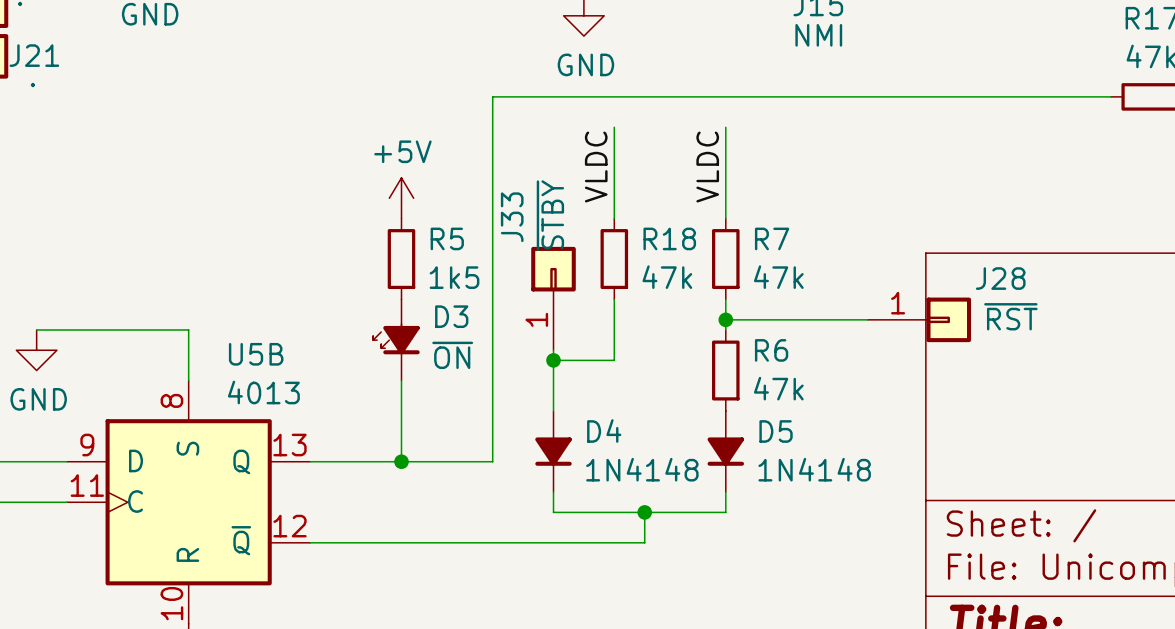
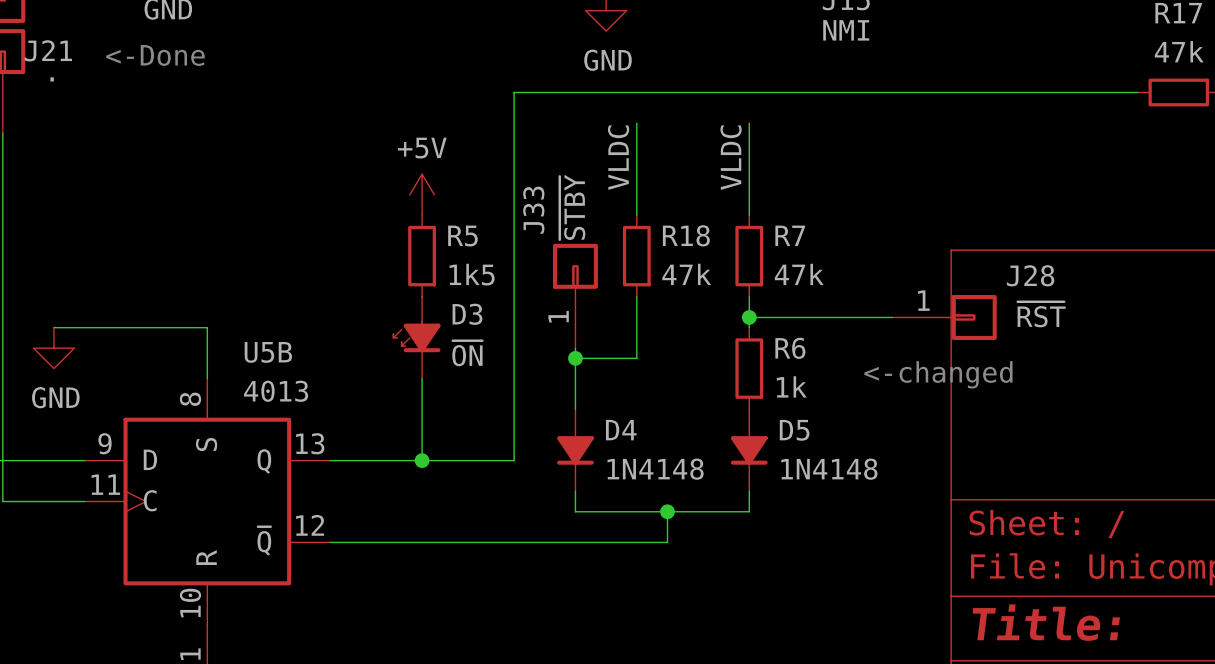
text: none -> <-Done (155, 55)
text: none -> <-changed (938, 374)
R6 value: 47k (778, 388) -> 1k (791, 386)

